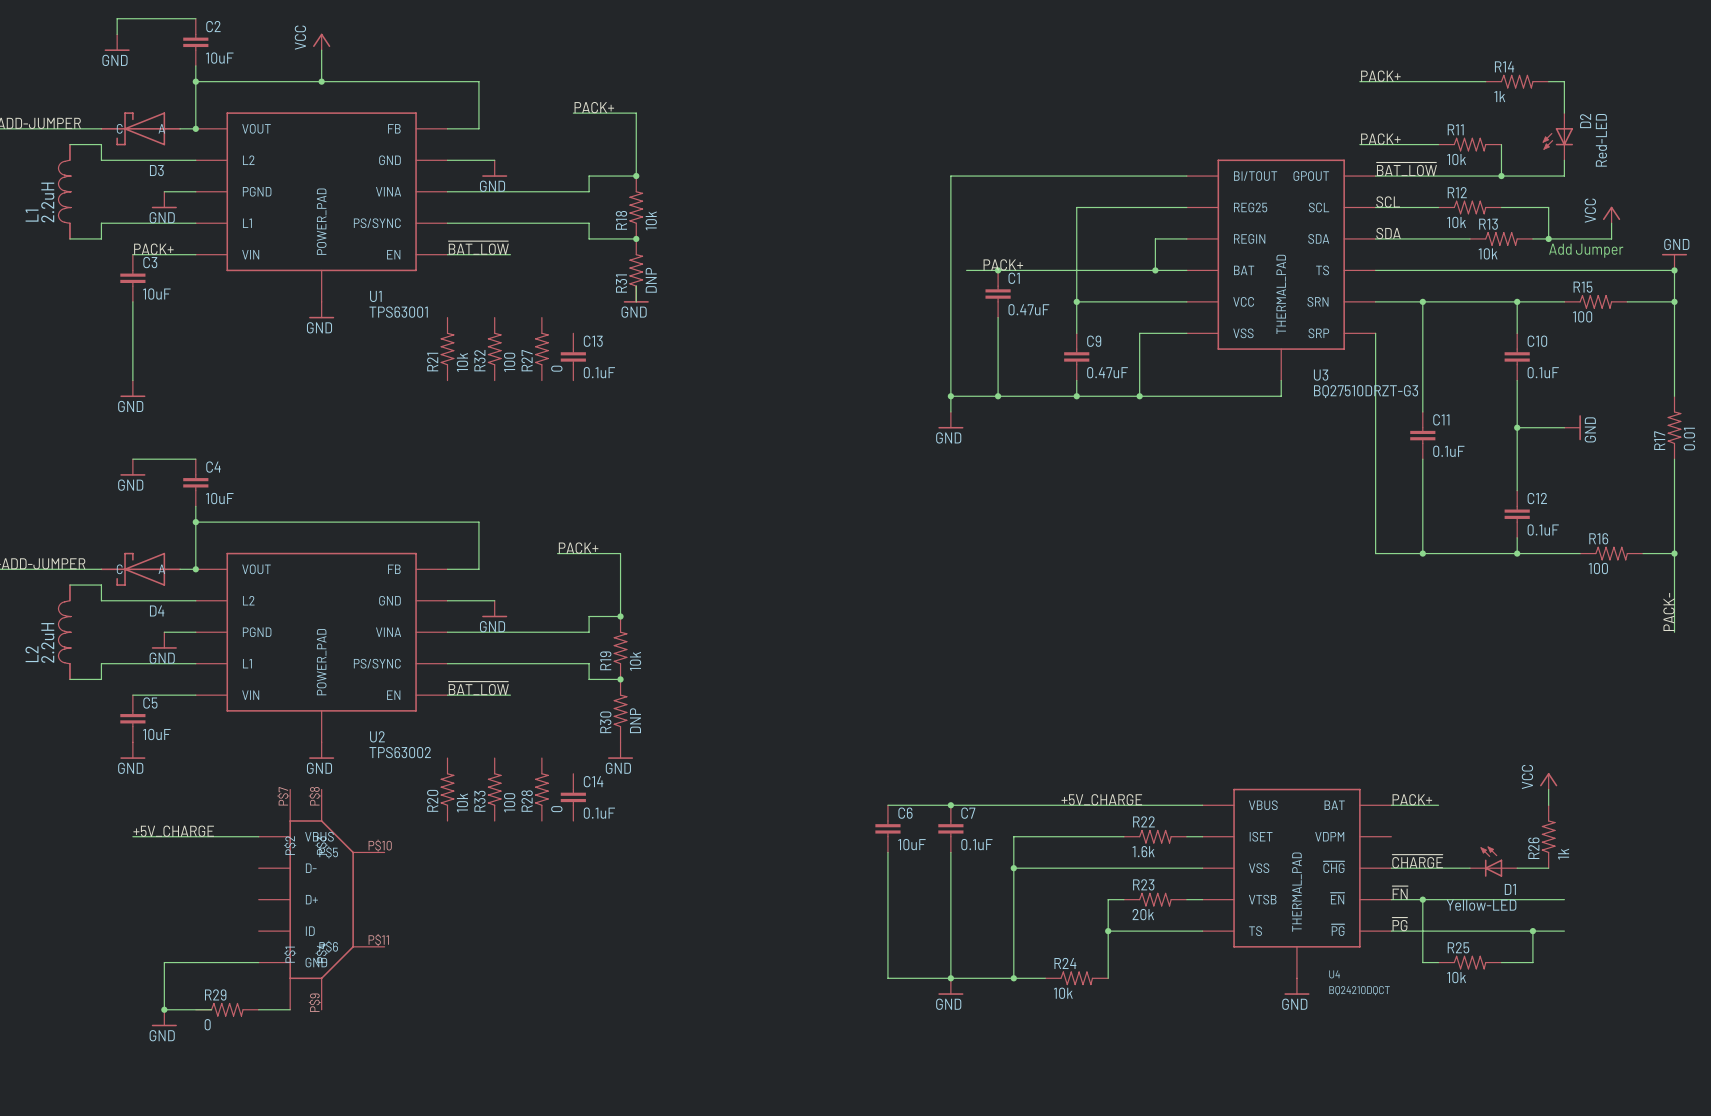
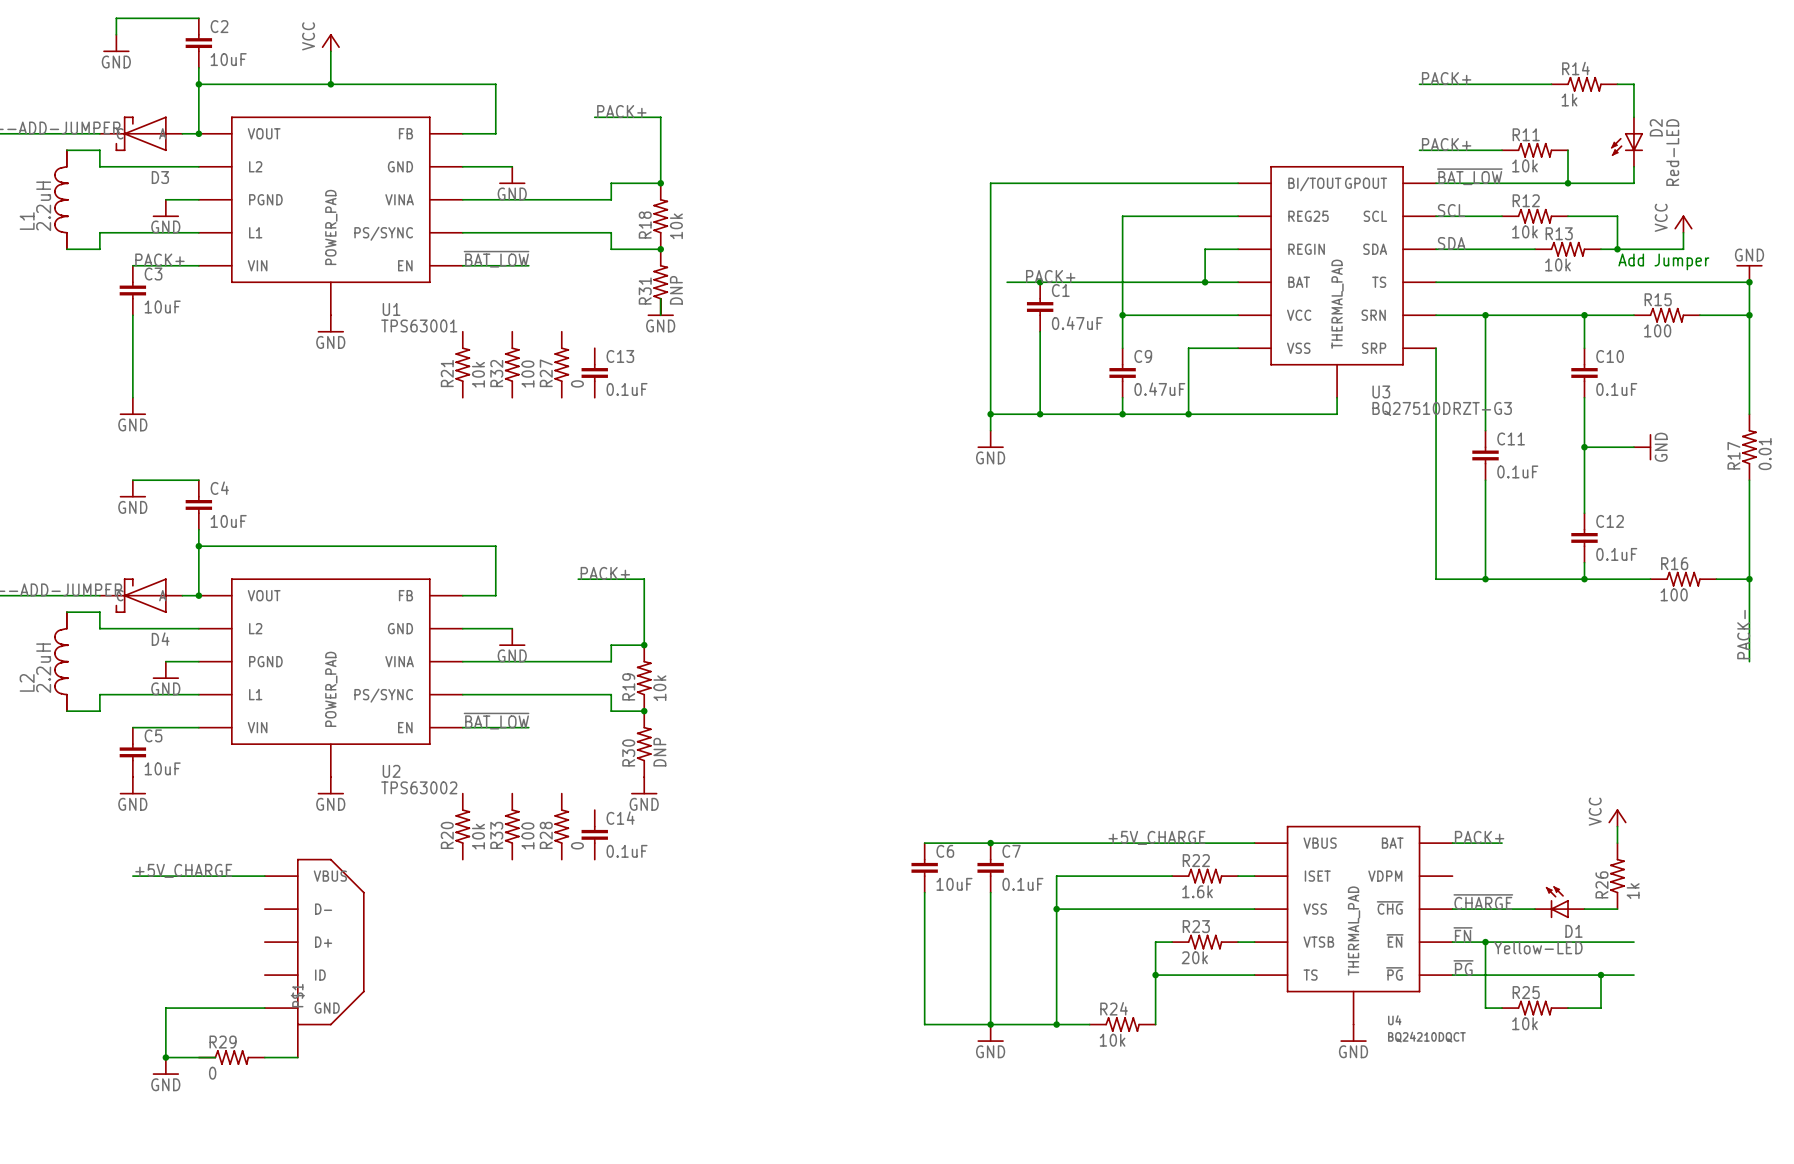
part: (321, 899) -> none
part: none -> (314, 958)

